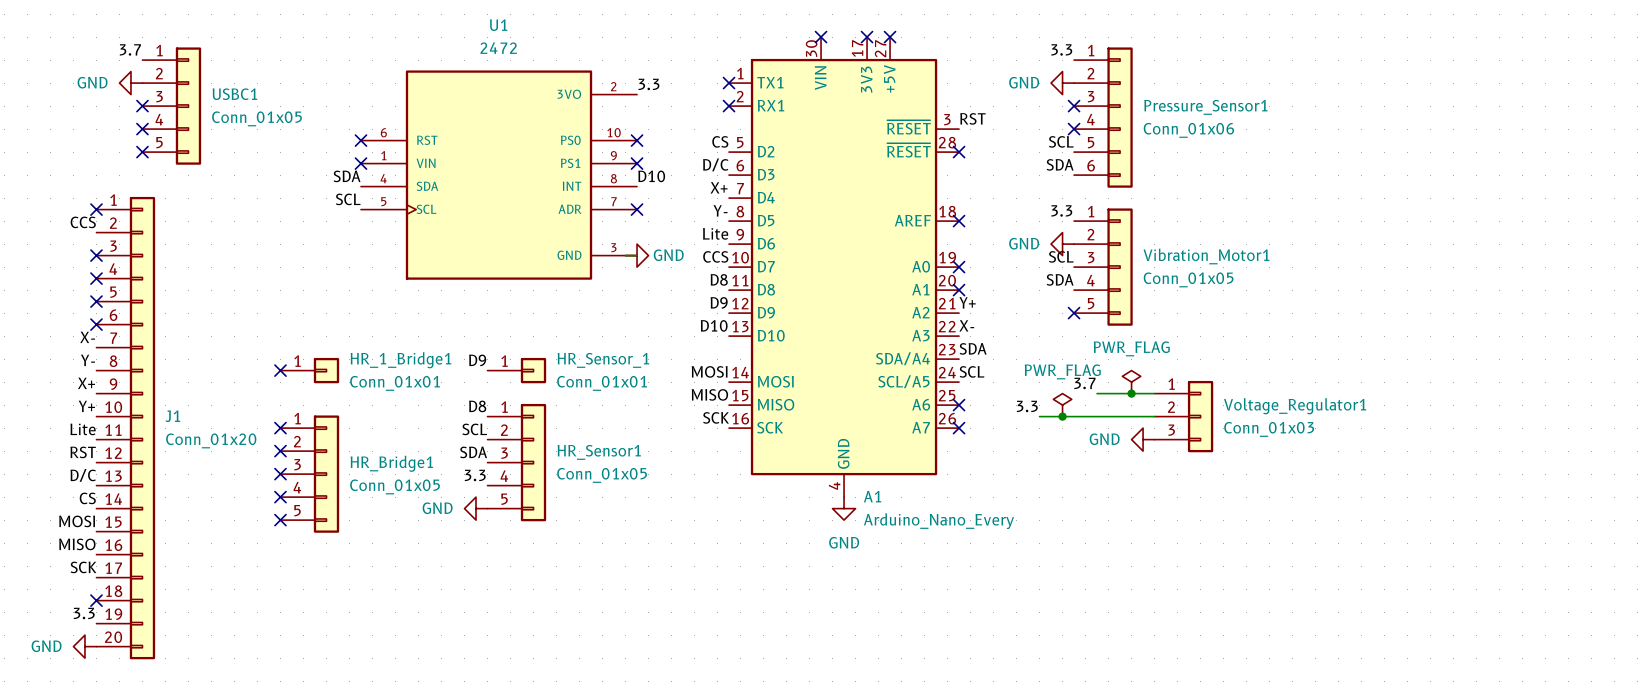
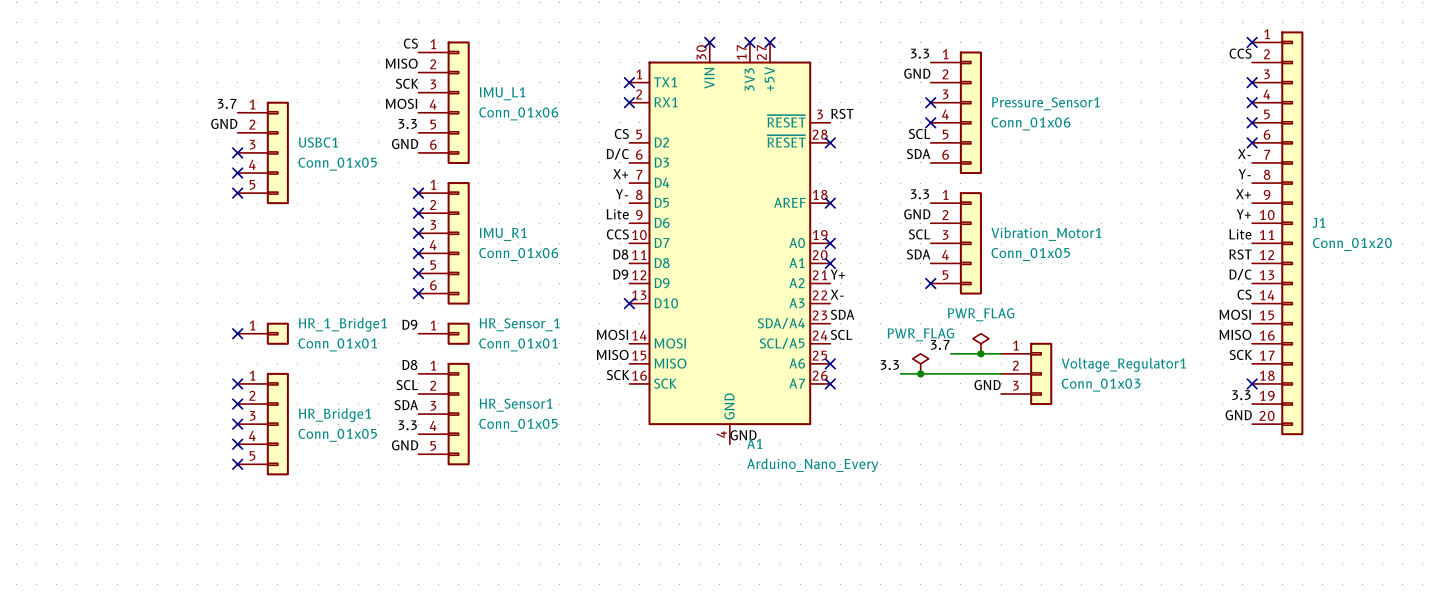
no-connect mark: none -> (1252, 42)
label: none -> CS (410, 43)
label position: 3.7 (130, 49) -> 3.7 (227, 103)
label: none -> CCS (1240, 53)
label: none -> MISO (401, 63)
label: none -> GND (917, 73)
power symbol: GND (130, 83) -> none
power symbol: GND (1062, 83) -> none
no-connect mark: none -> (1252, 82)
label: none -> SCK (407, 83)
label position: 3.3 (648, 84) -> 3.3 (407, 124)
no-connect mark: (142, 106) -> none
USBC1 position: (171, 106) -> (263, 152)
IMU_L1: none -> Conn_01x06 (444, 102)
no-connect mark: none -> (1252, 102)
label: none -> MOSI (401, 103)
no-connect mark: (142, 129) -> none
no-connect mark: none -> (1252, 122)
label: none -> GND (224, 123)
no-connect mark: (360, 140) -> none
no-connect mark: (637, 140) -> none
no-connect mark: (142, 152) -> none
no-connect mark: none -> (1252, 142)
label: none -> GND (405, 144)
no-connect mark: none -> (237, 152)
no-connect mark: (360, 163) -> none
no-connect mark: (637, 163) -> none
label: none -> X- (1244, 154)
U1: 2472 (499, 175) -> none
label: SDA (347, 176) -> none
label: D10 (651, 176) -> none
no-connect mark: none -> (237, 173)
label: none -> Y- (1244, 174)
label: SCL (348, 199) -> none
no-connect mark: (96, 209) -> none
no-connect mark: none -> (237, 193)
no-connect mark: none -> (418, 193)
no-connect mark: (637, 209) -> none
label: none -> X+ (1243, 194)
label: CCS (83, 222) -> none
no-connect mark: none -> (418, 213)
label: none -> GND (917, 214)
label: none -> Y+ (1243, 214)
power symbol: GND (1062, 244) -> none
no-connect mark: (96, 255) -> none
no-connect mark: none -> (418, 233)
wire: (625, 255) (637, 255) -> none
power symbol: GND (637, 255) -> none
label: none -> Lite (1240, 234)
IMU_R1: none -> Conn_01x06 (444, 243)
no-connect mark: (96, 278) -> none
no-connect mark: none -> (418, 253)
label: none -> RST (1240, 254)
no-connect mark: (96, 301) -> none
no-connect mark: none -> (418, 273)
label: none -> D/C (1240, 274)
no-connect mark: (96, 324) -> none
no-connect mark: none -> (418, 293)
label: D10 (714, 325) -> none
label: none -> CS (1244, 294)
no-connect mark: none -> (629, 303)
label: X- (87, 337) -> none
label: none -> MOSI (1235, 314)
label: Y- (87, 360) -> none
label: none -> MISO (1235, 334)
label: X+ (86, 383) -> none
label: none -> SCK (1240, 354)
label: Y+ (86, 406) -> none
J1 position: (125, 428) -> (1277, 233)
no-connect mark: none -> (1252, 383)
label: Lite (83, 429) -> none
label: none -> GND (987, 385)
power symbol: GND (1143, 439) -> none
label: none -> 3.3 (1241, 395)
label: RST (83, 452) -> none
label: none -> GND (1238, 415)
label: D/C (83, 475) -> none
label: none -> GND (743, 435)
label: CS (87, 498) -> none
label: none -> GND (405, 445)
power symbol: GND (476, 508) -> none
power symbol: GND (844, 508) -> none
label: MOSI (77, 521) -> none
label: MISO (77, 544) -> none
label: SCK (83, 567) -> none
no-connect mark: (96, 600) -> none
label: 3.3 (84, 613) -> none
power symbol: GND (84, 646) -> none

